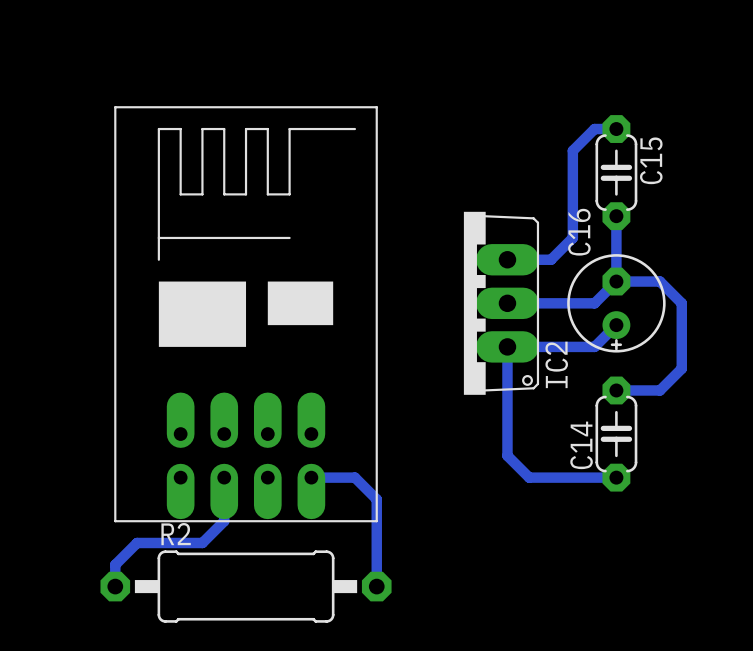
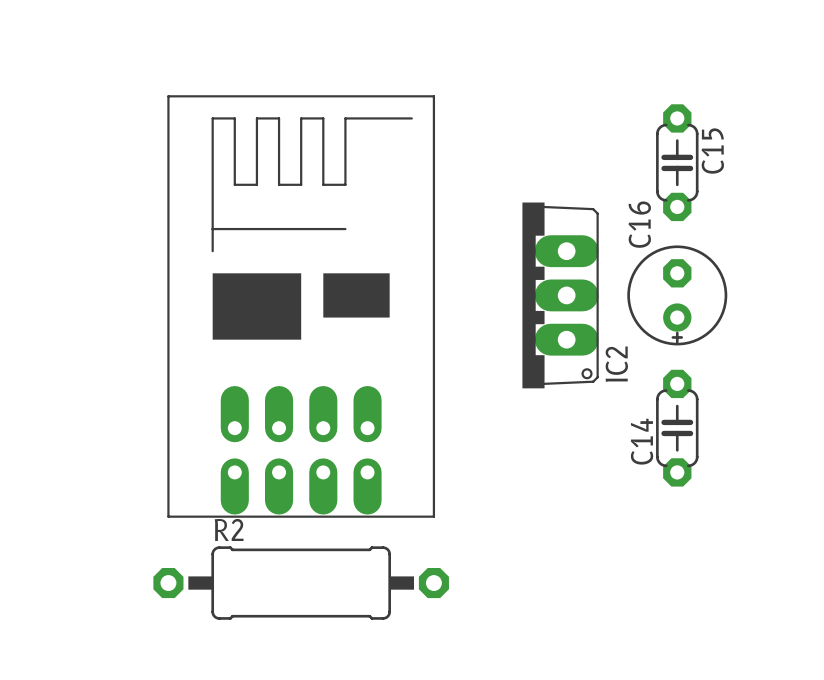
bottom track: (616, 129) (594, 129) (572, 150) (572, 237) (551, 259) (507, 259) -> none
bottom track: (616, 216) (616, 281) -> none
bottom track: (616, 281) (594, 303) (507, 303) -> none
bottom track: (616, 281) (659, 281) (681, 303) (681, 368) (659, 390) (616, 390) -> none
bottom track: (616, 325) (594, 346) (507, 346) (507, 455) (529, 477) (616, 477) -> none
bottom track: (224, 477) (224, 521) (202, 542) (137, 542) (115, 564) (115, 586) -> none
bottom track: (311, 477) (354, 477) (376, 499) (376, 586) -> none

